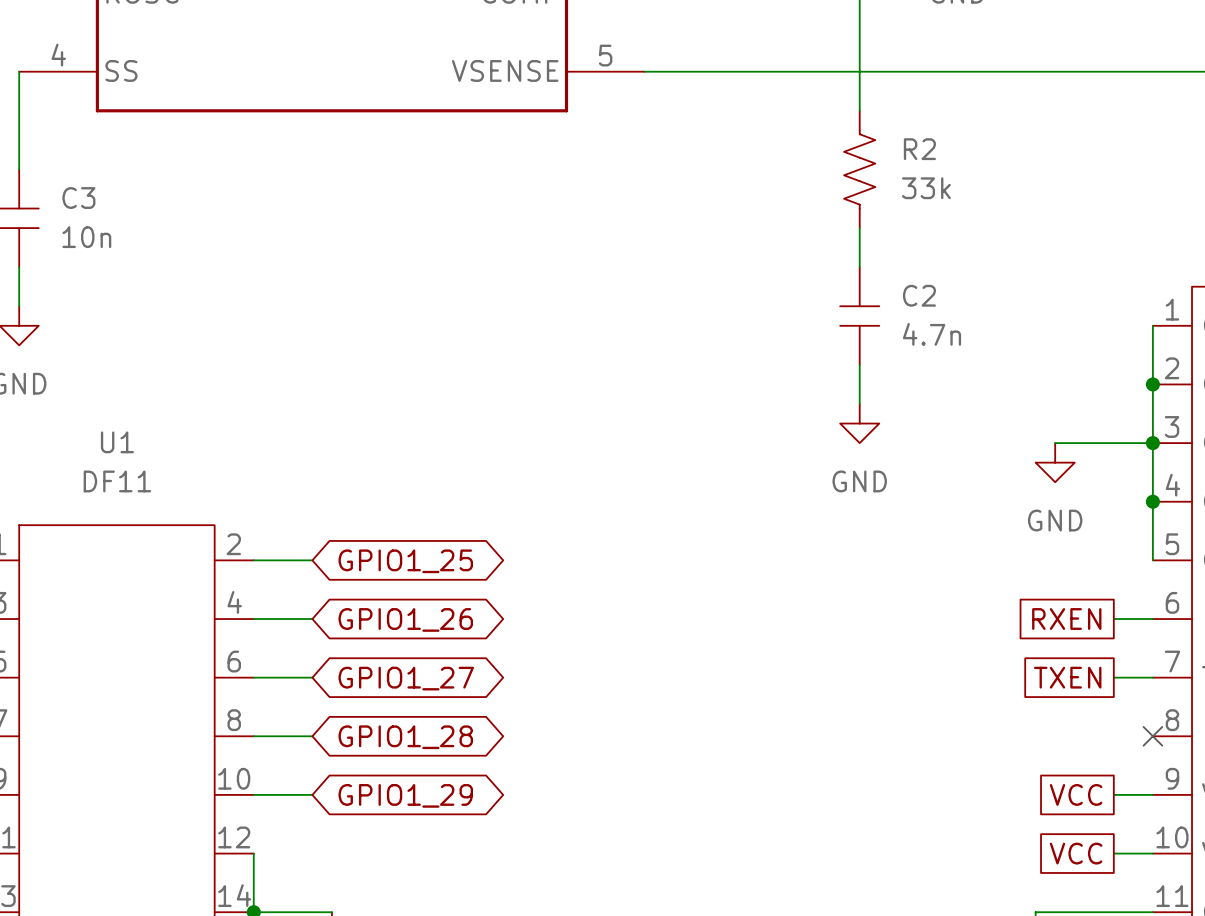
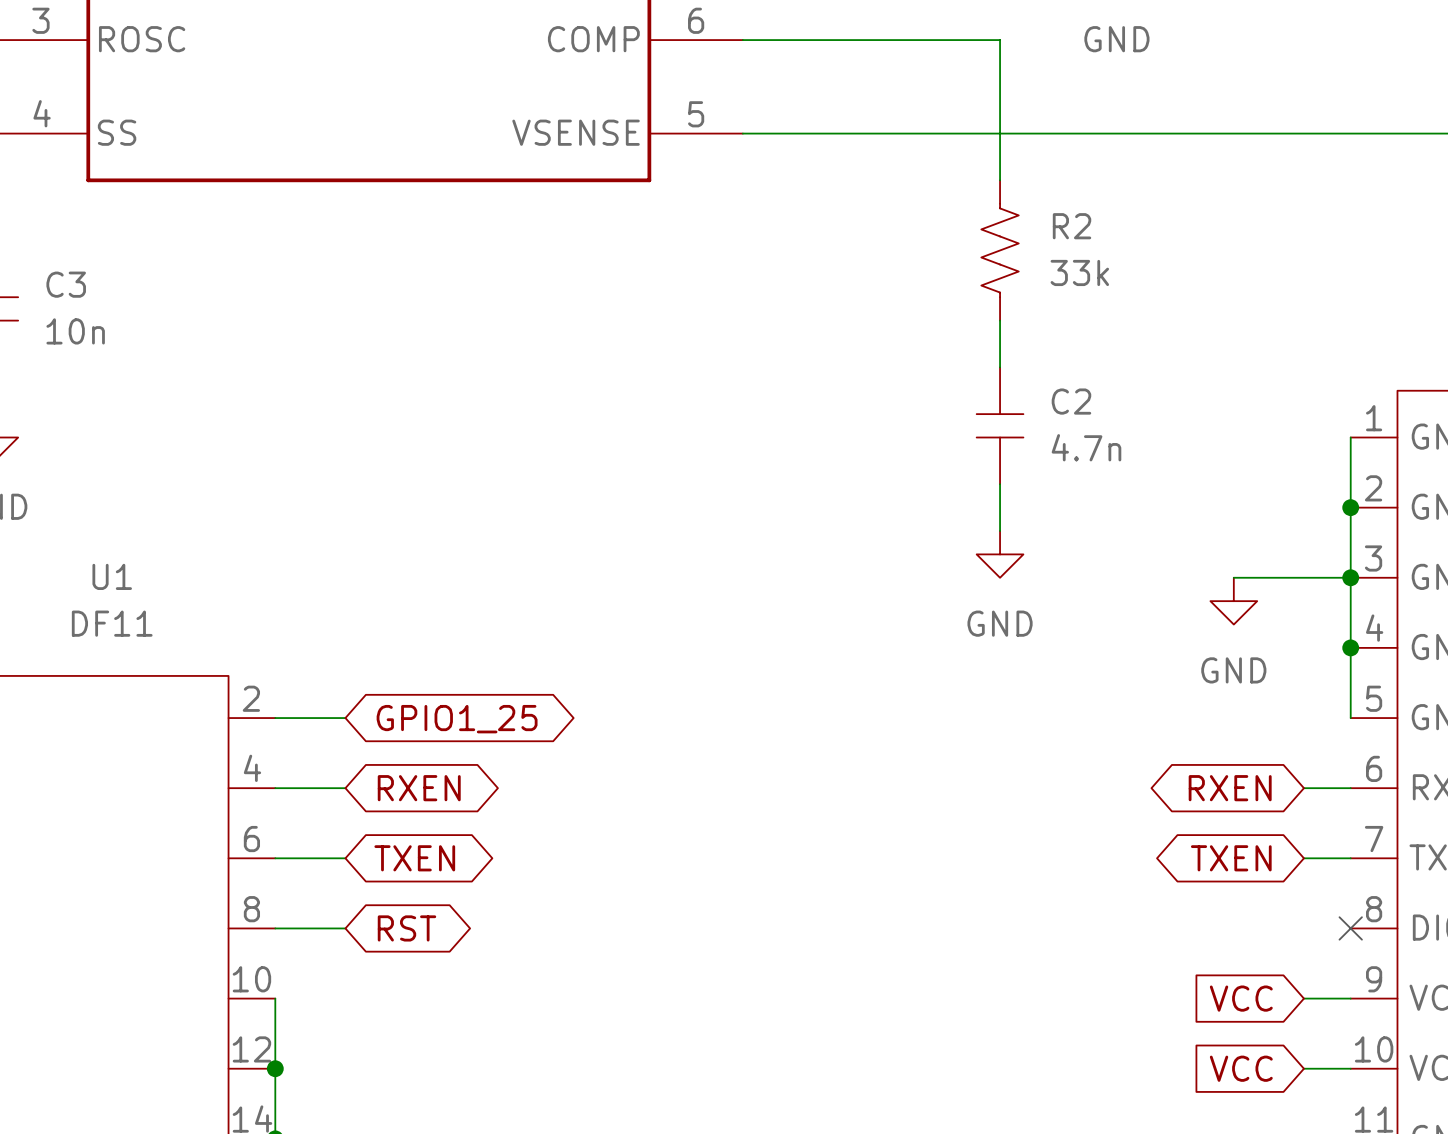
global label: GPIO1_26 (405, 619) -> RXEN (419, 788)
global label shape: passive (1066, 619) -> bidirectional (1230, 788)
global label shape: passive (1067, 677) -> bidirectional (1231, 858)
global label: GPIO1_27 (406, 678) -> TXEN (414, 858)
global label: GPIO1_28 (405, 737) -> RST (406, 928)
wire: (253, 794) (312, 794) -> (275, 998) (275, 1068)
global label shape: passive (1076, 794) -> input (1241, 998)
global label: GPIO1_29 (405, 795) -> none
junction: none -> (275, 1068)
global label shape: passive (1076, 853) -> input (1241, 1068)

